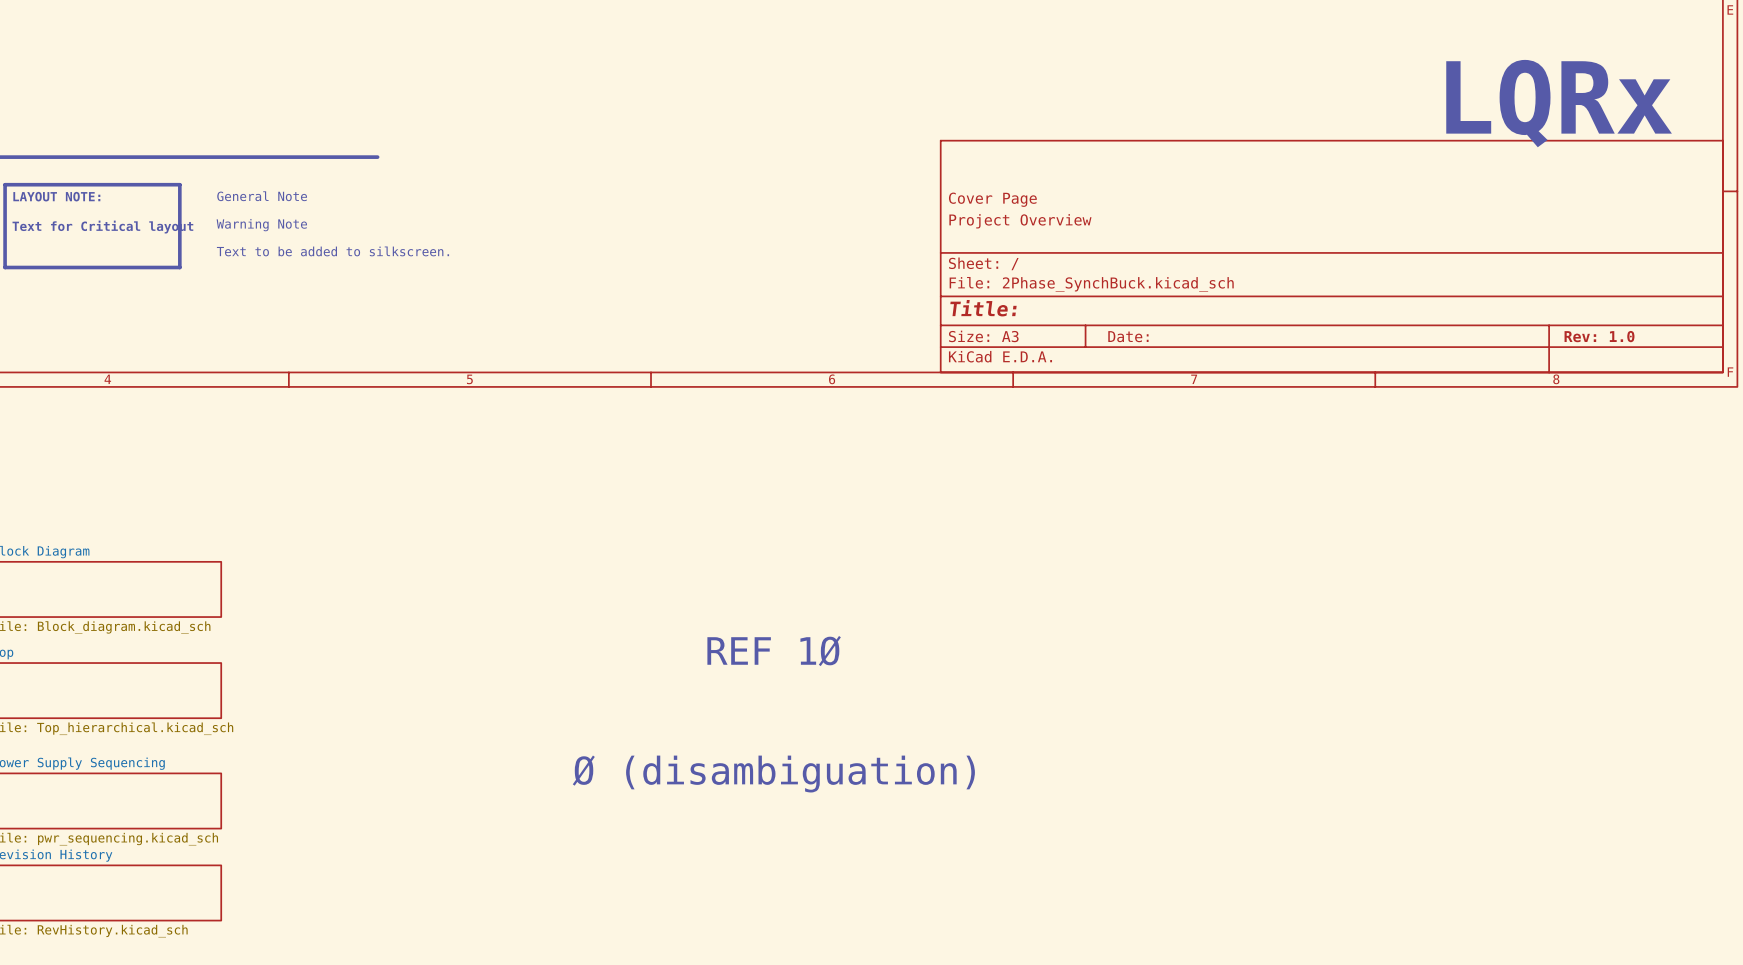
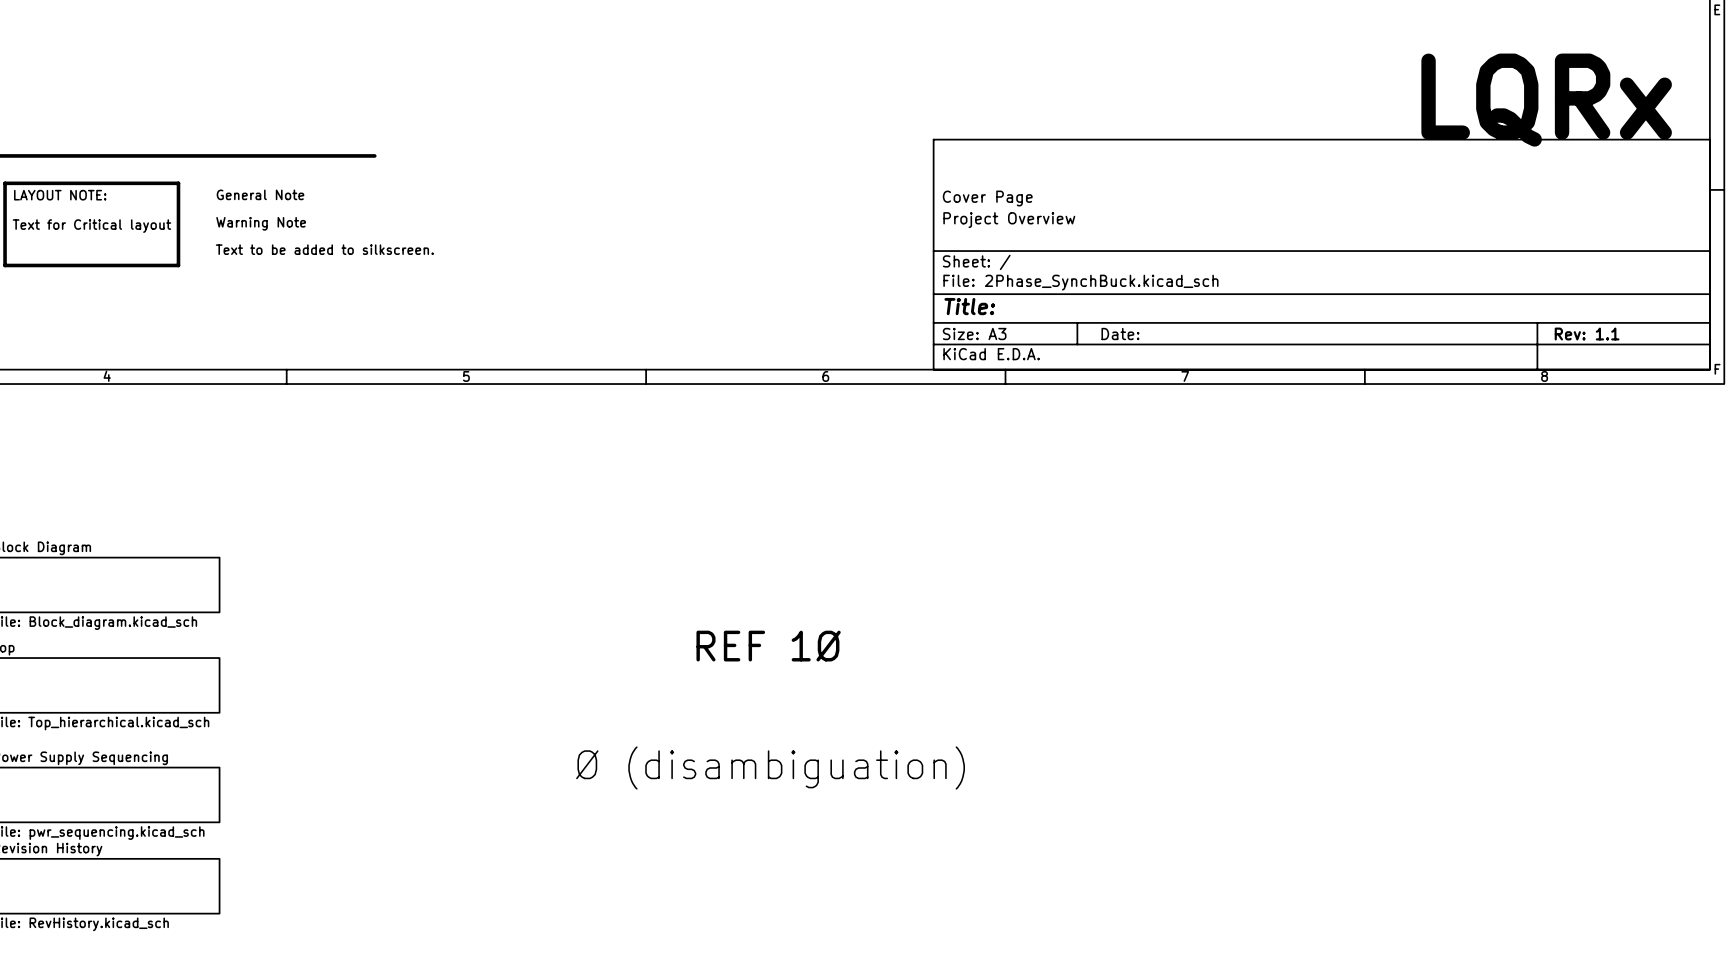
title block: Rev: 1.0 (1599, 336) -> Rev: 1.1 (1587, 334)

